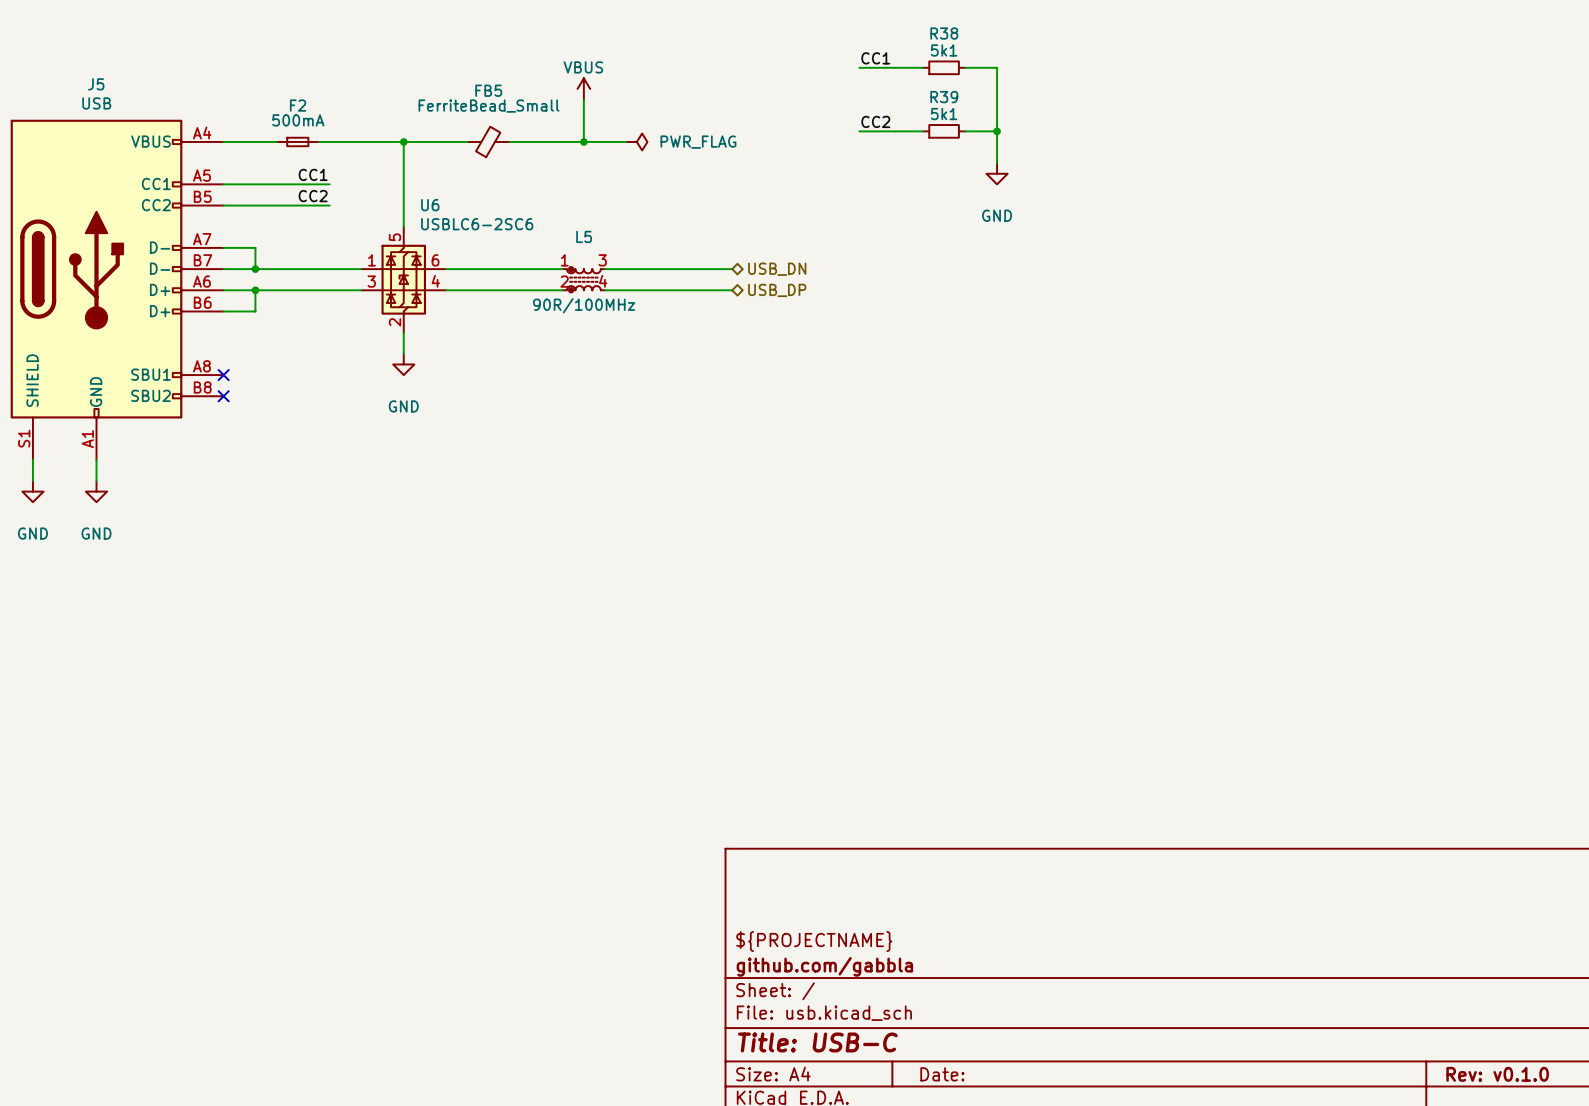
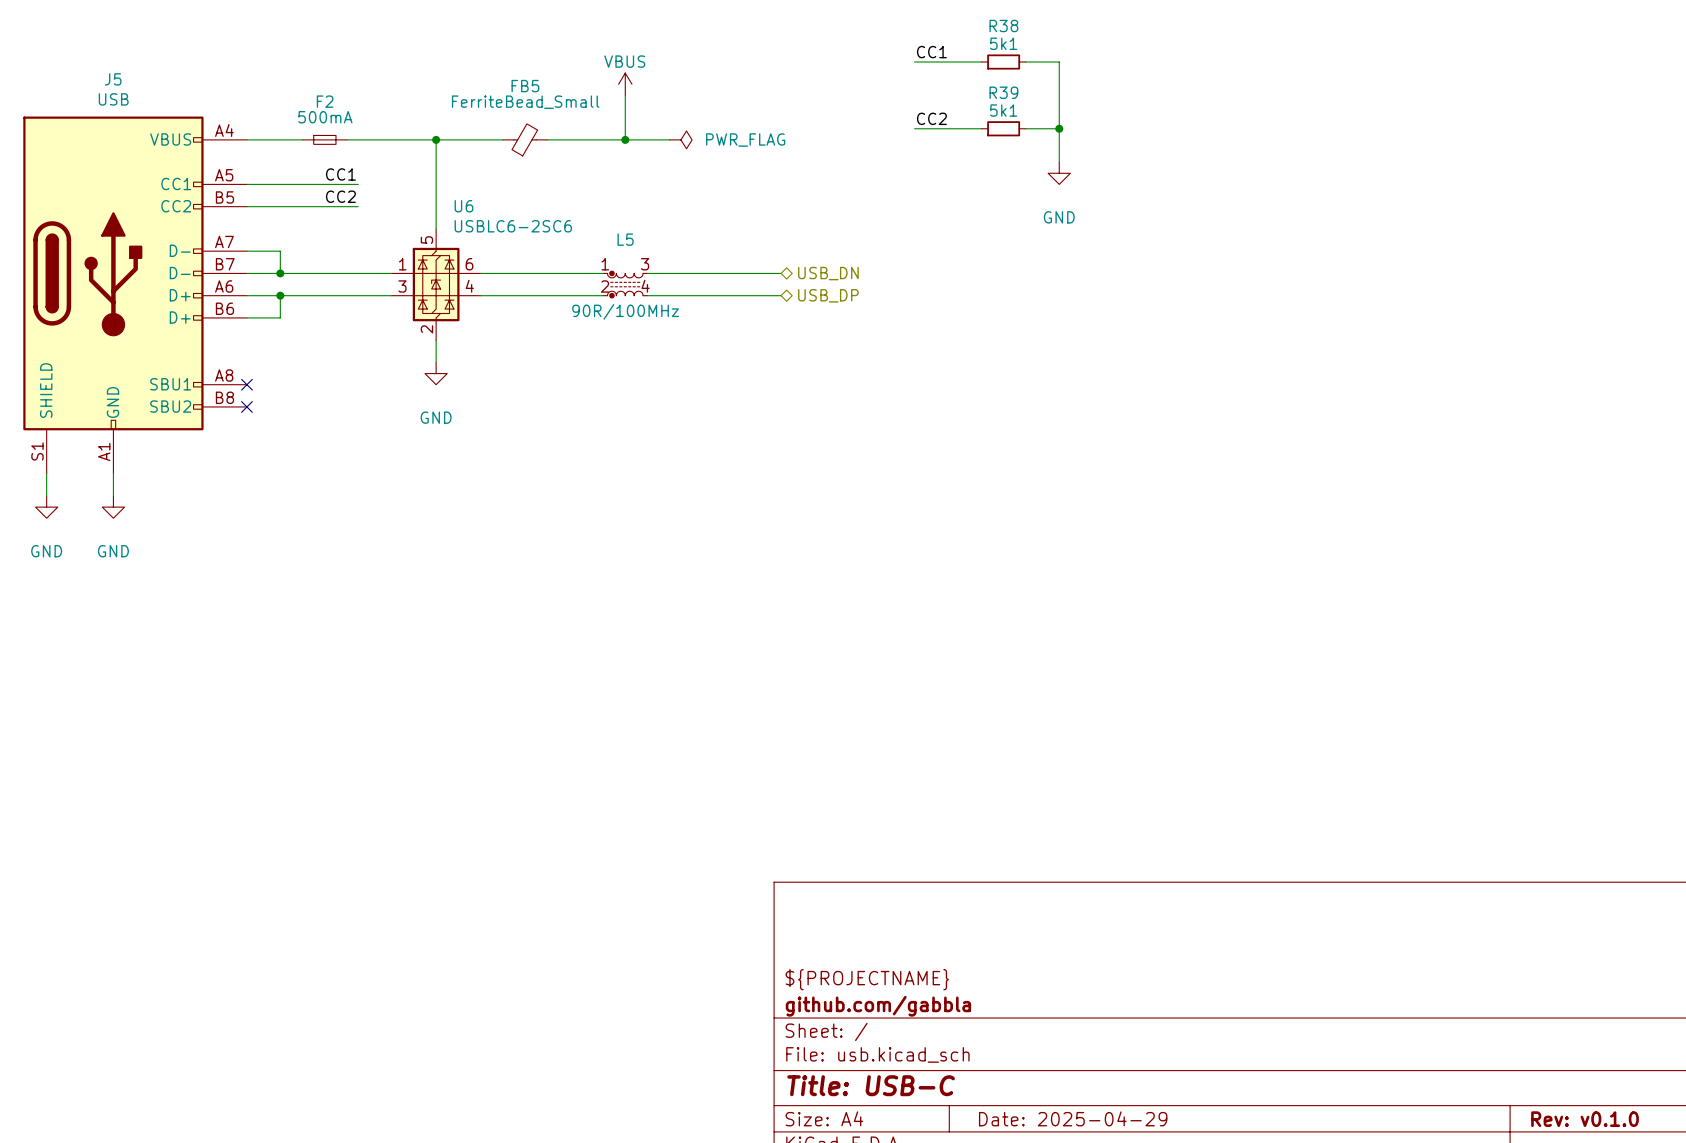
title block: Date: (942, 1074) -> Date: 2025-04-29 (1073, 1118)

